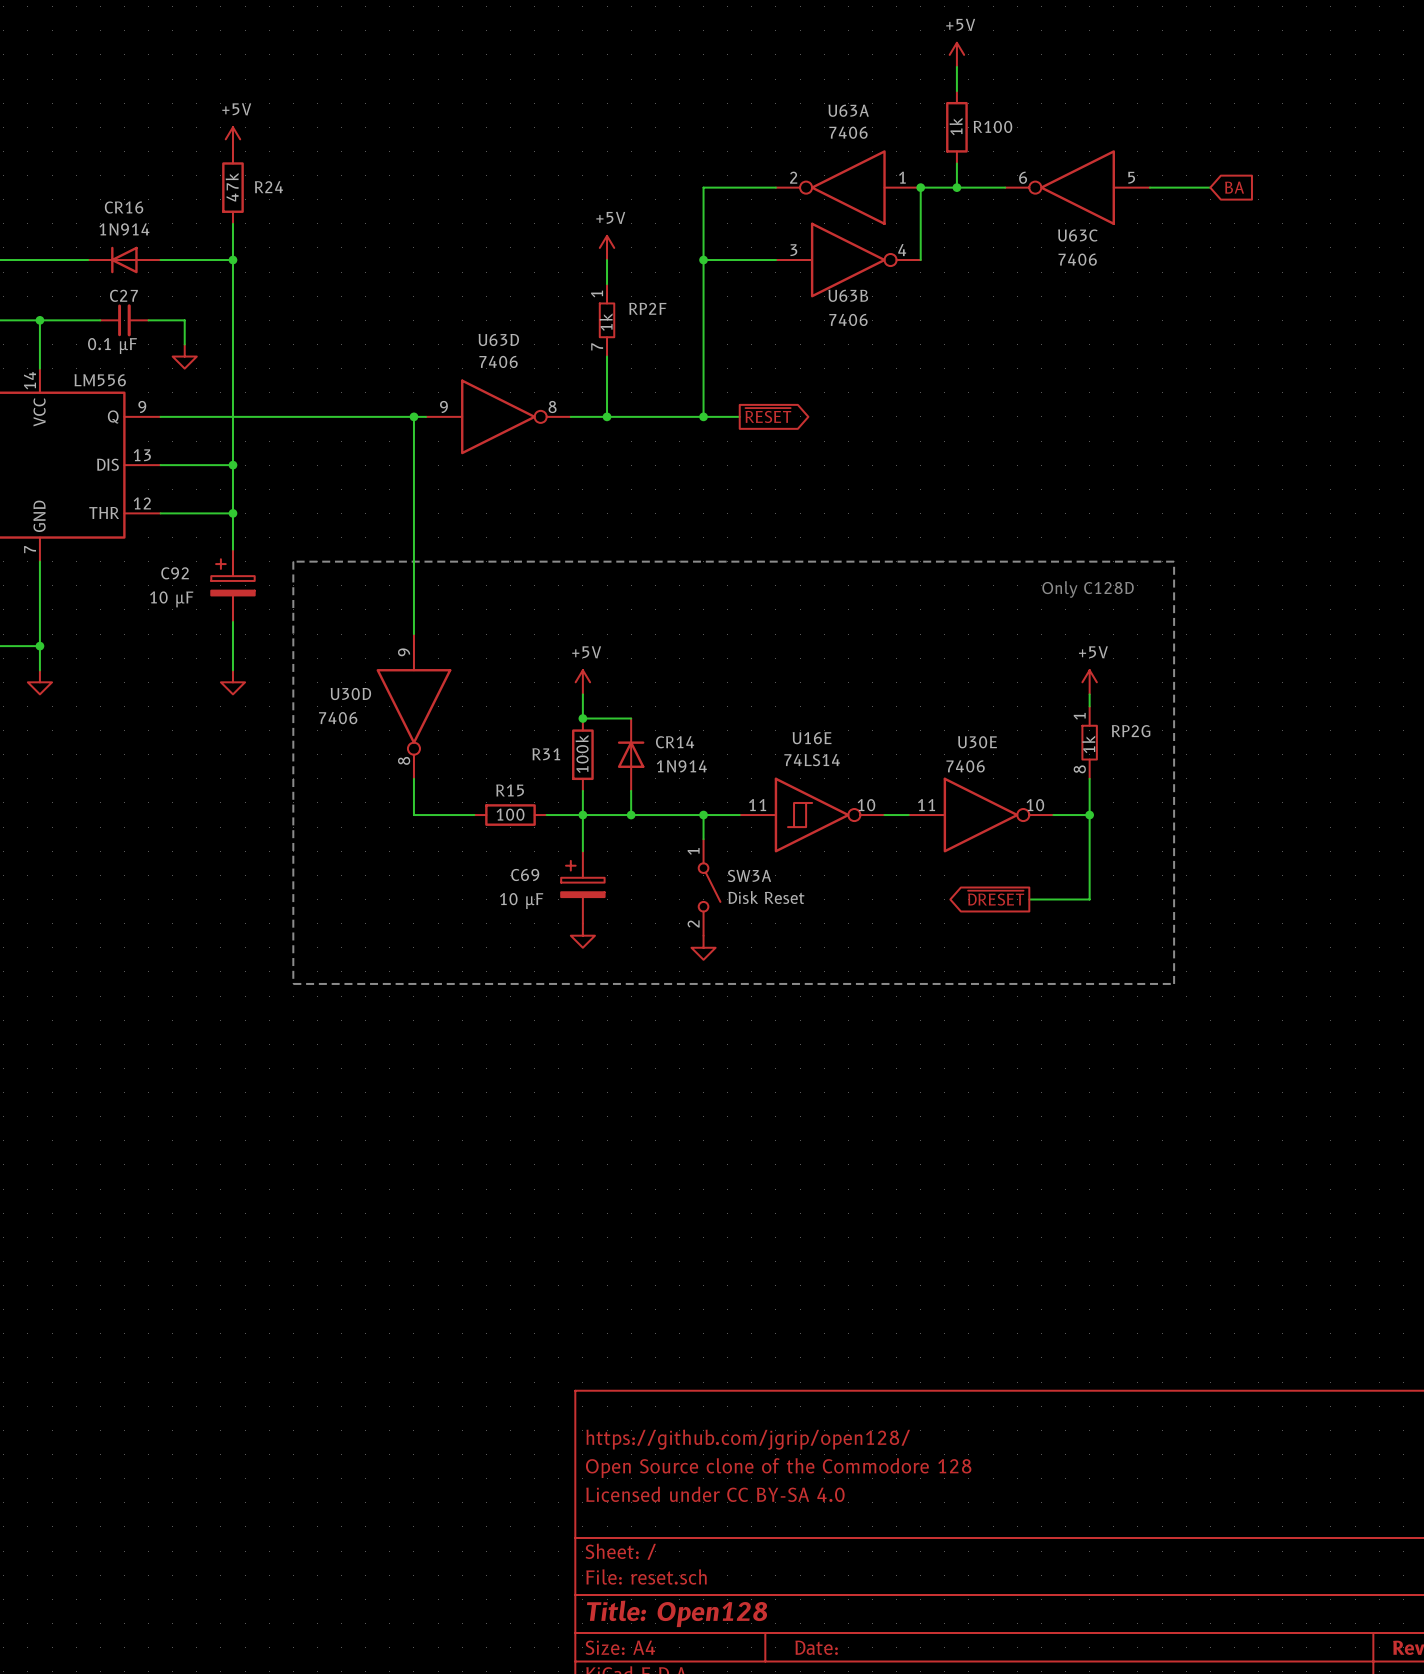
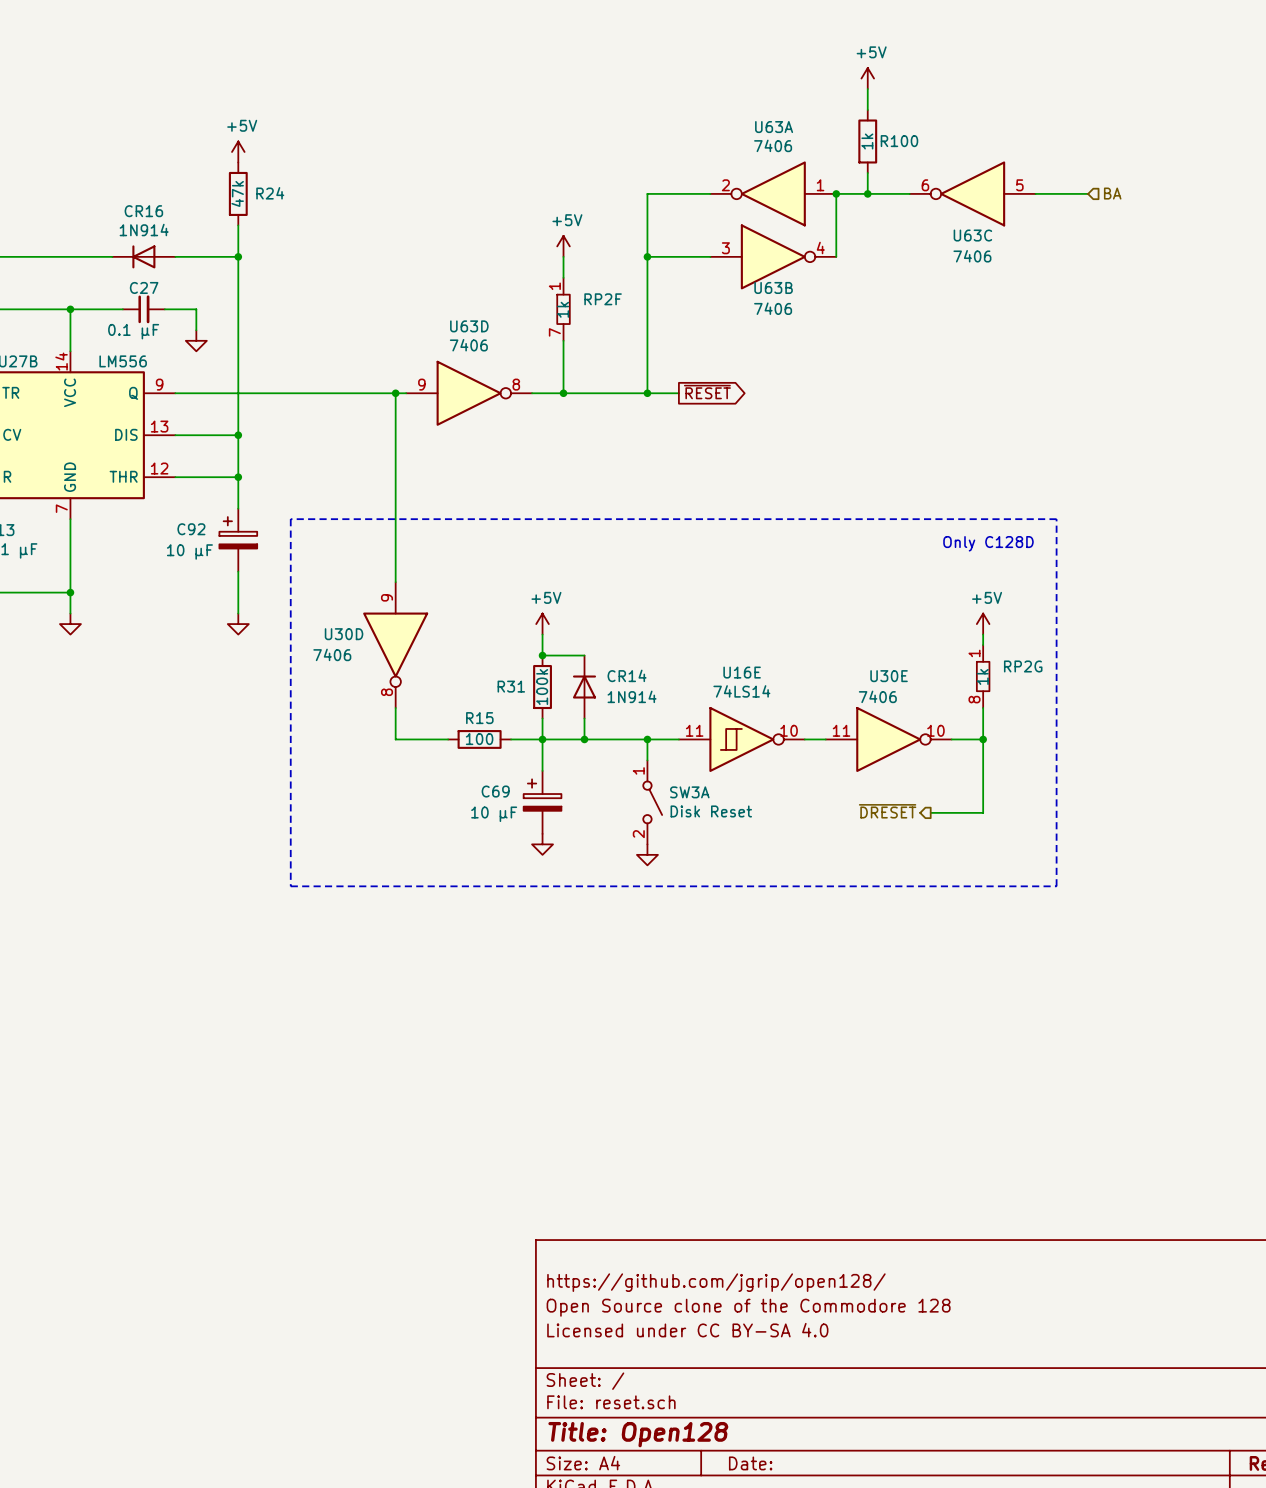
global label: BA (1234, 187) -> none
hierarchical label: none -> BA (1112, 193)
hierarchical label: none -> ~{DRESET} (887, 811)
global label: ~{DRESET} (996, 898) -> none

